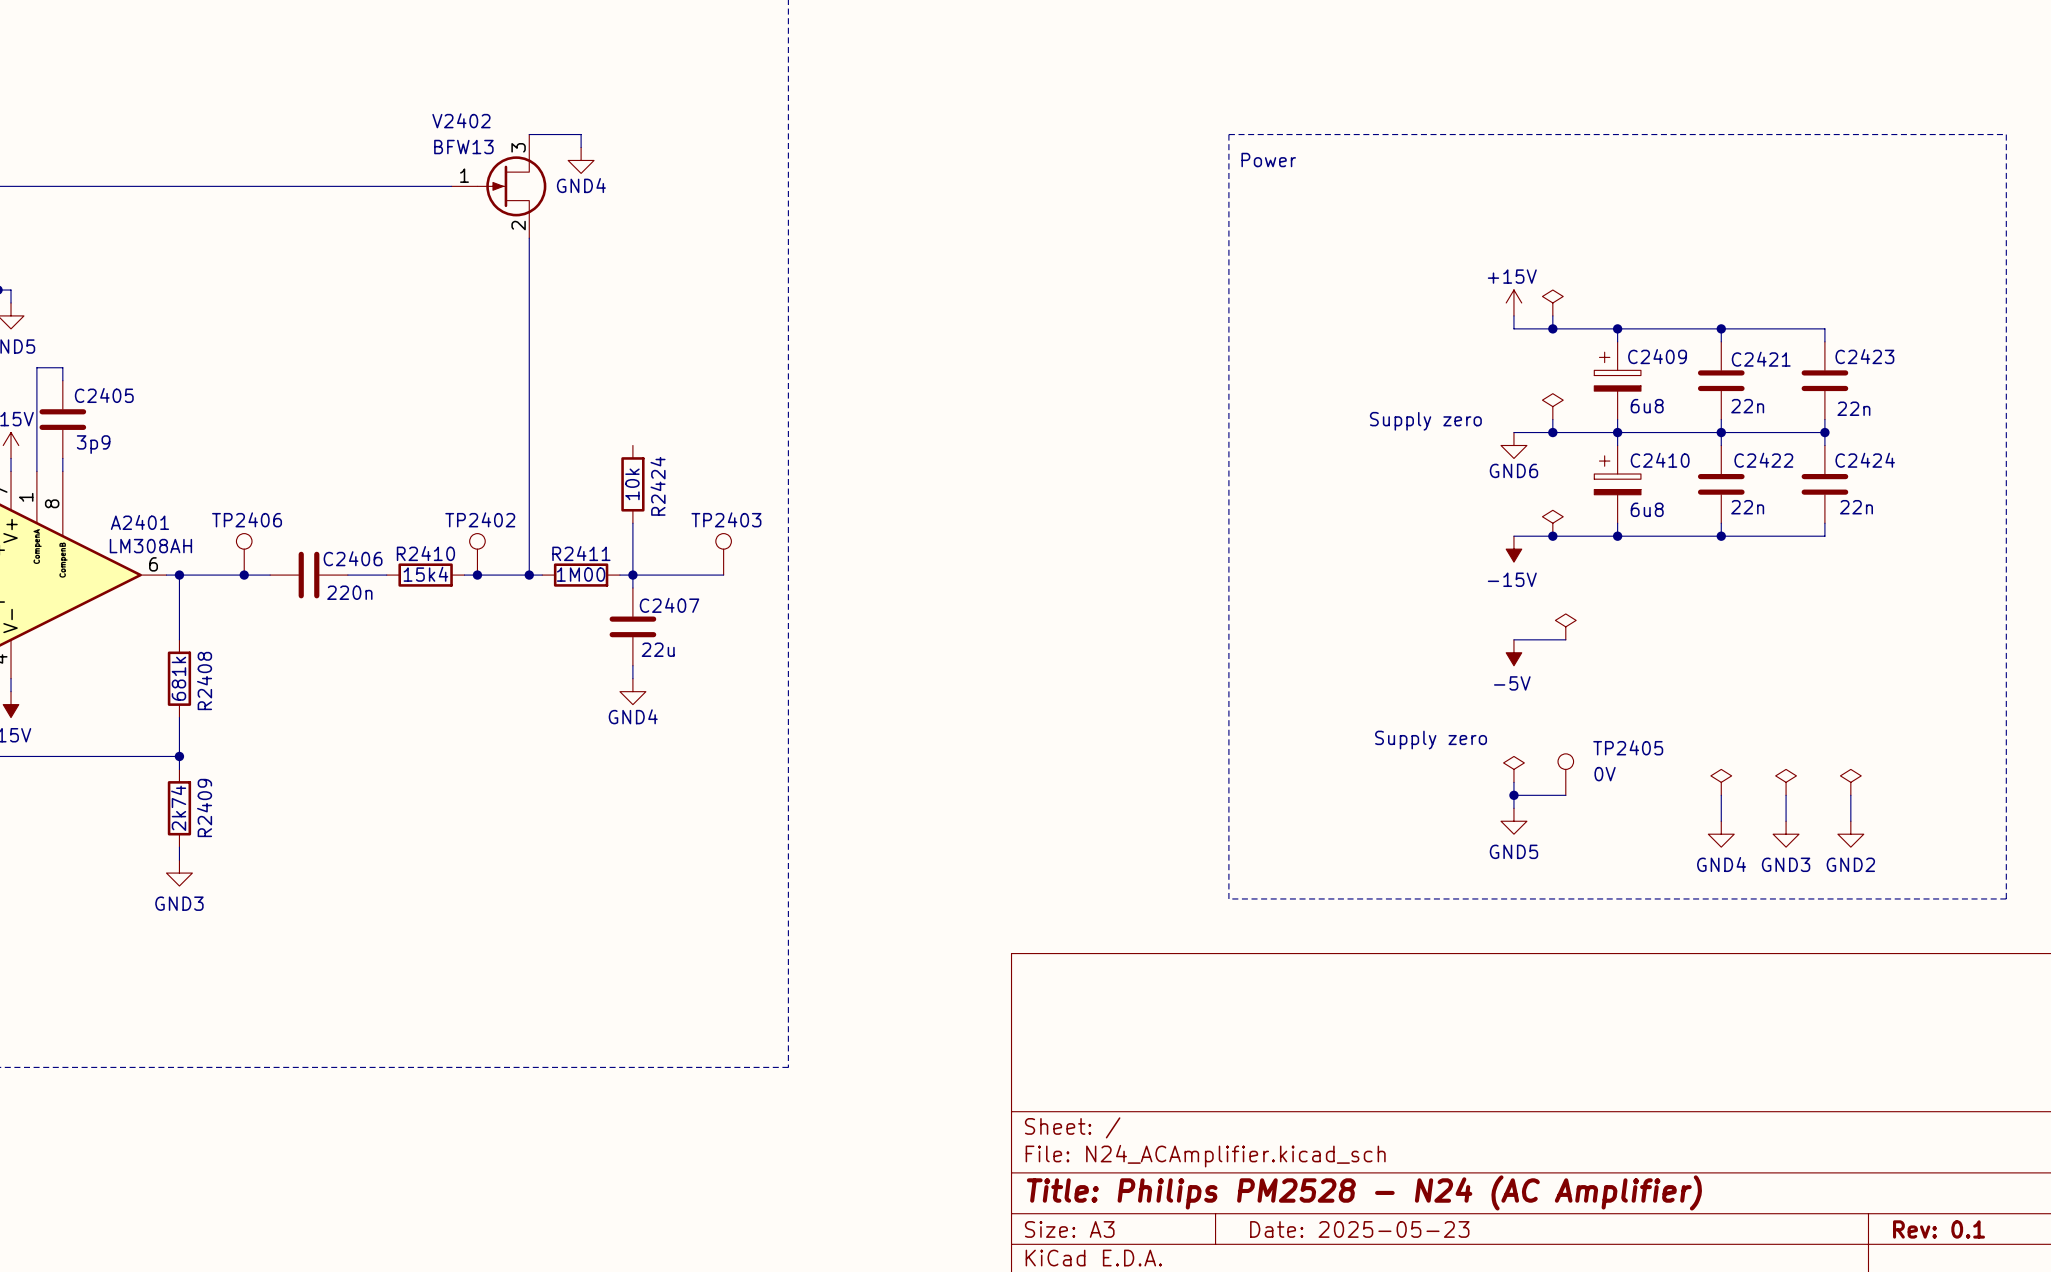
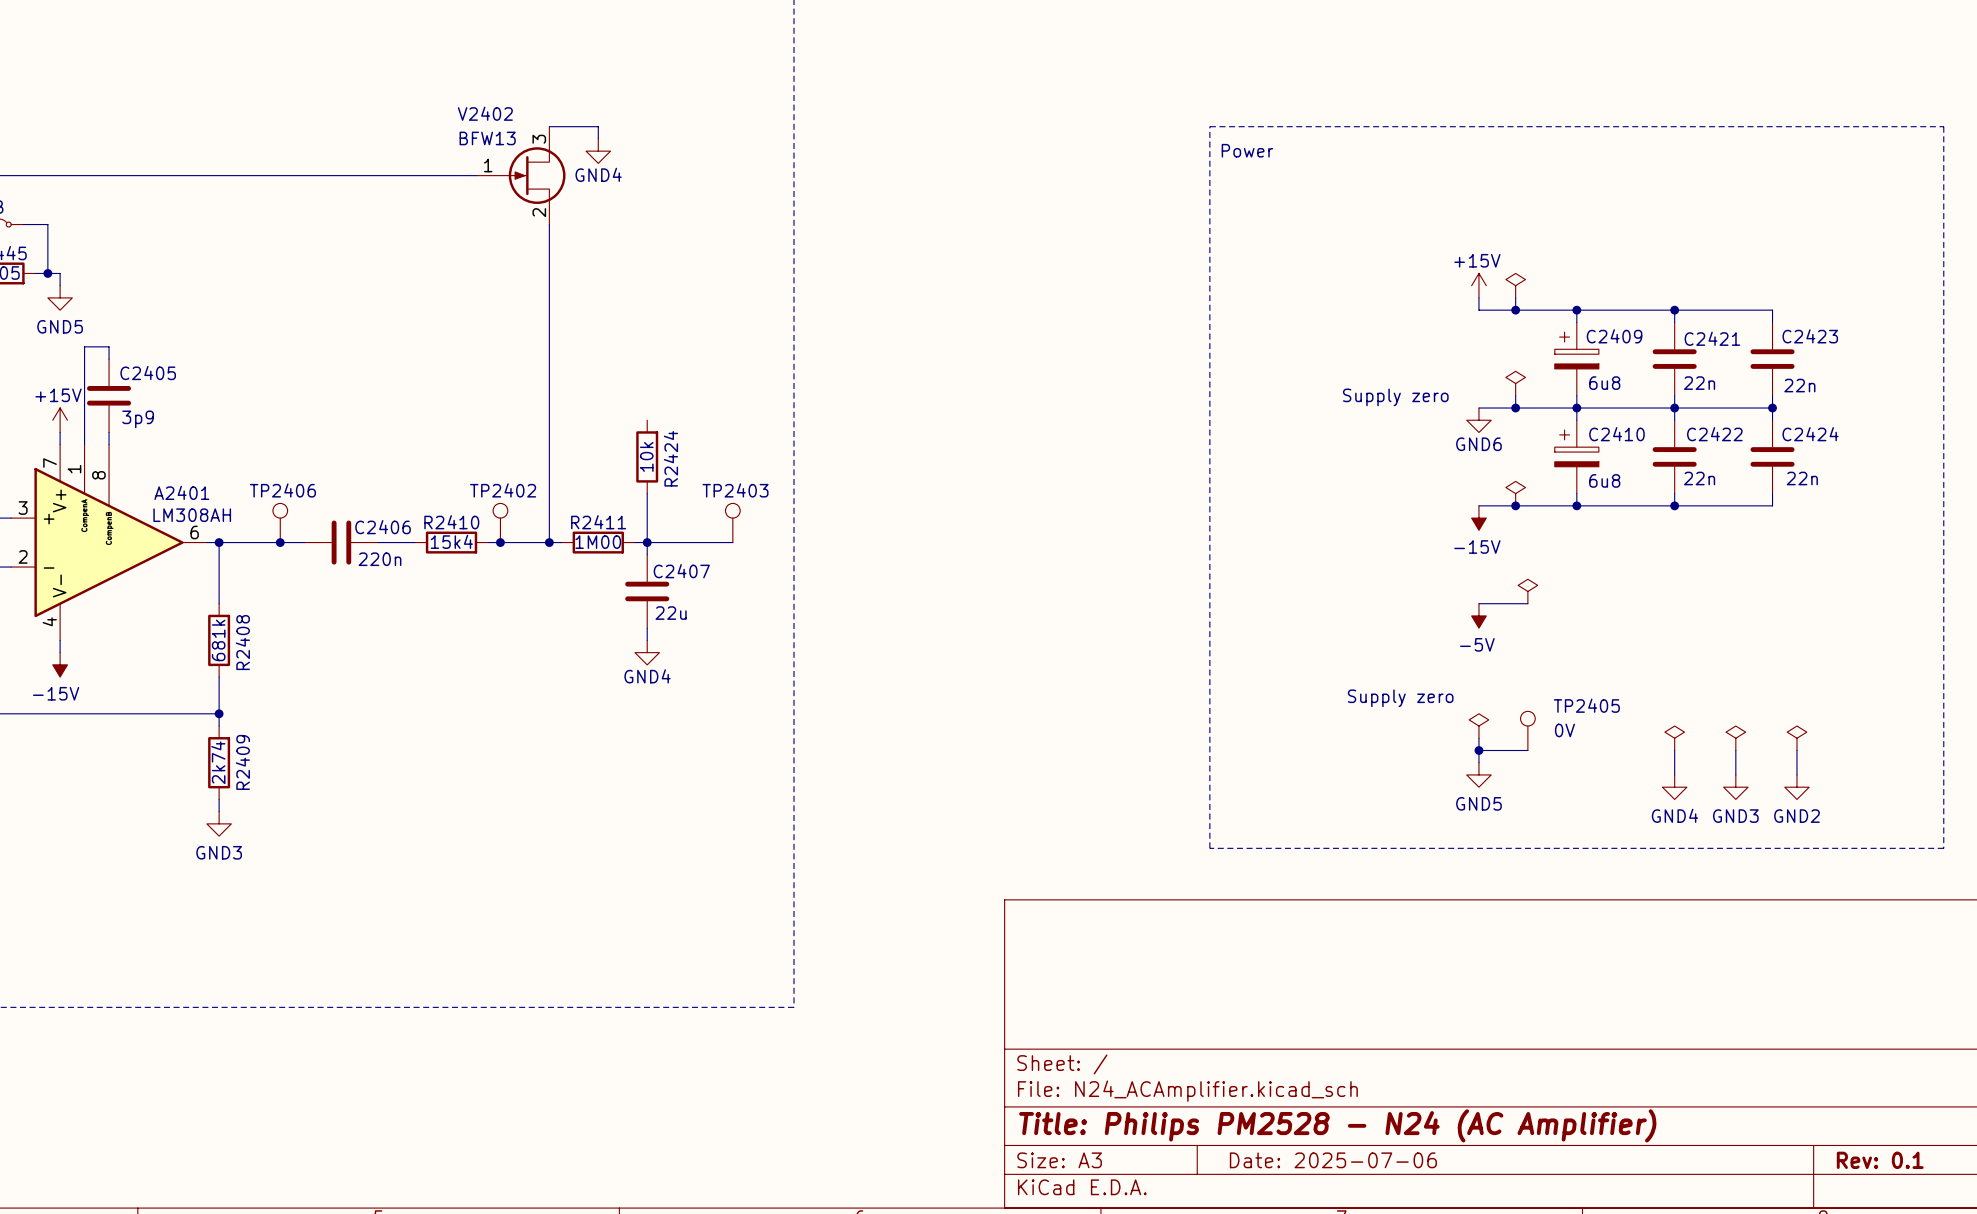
title block: Date: 2025-05-23 (1359, 1229) -> Date: 2025-07-06 (1333, 1160)

